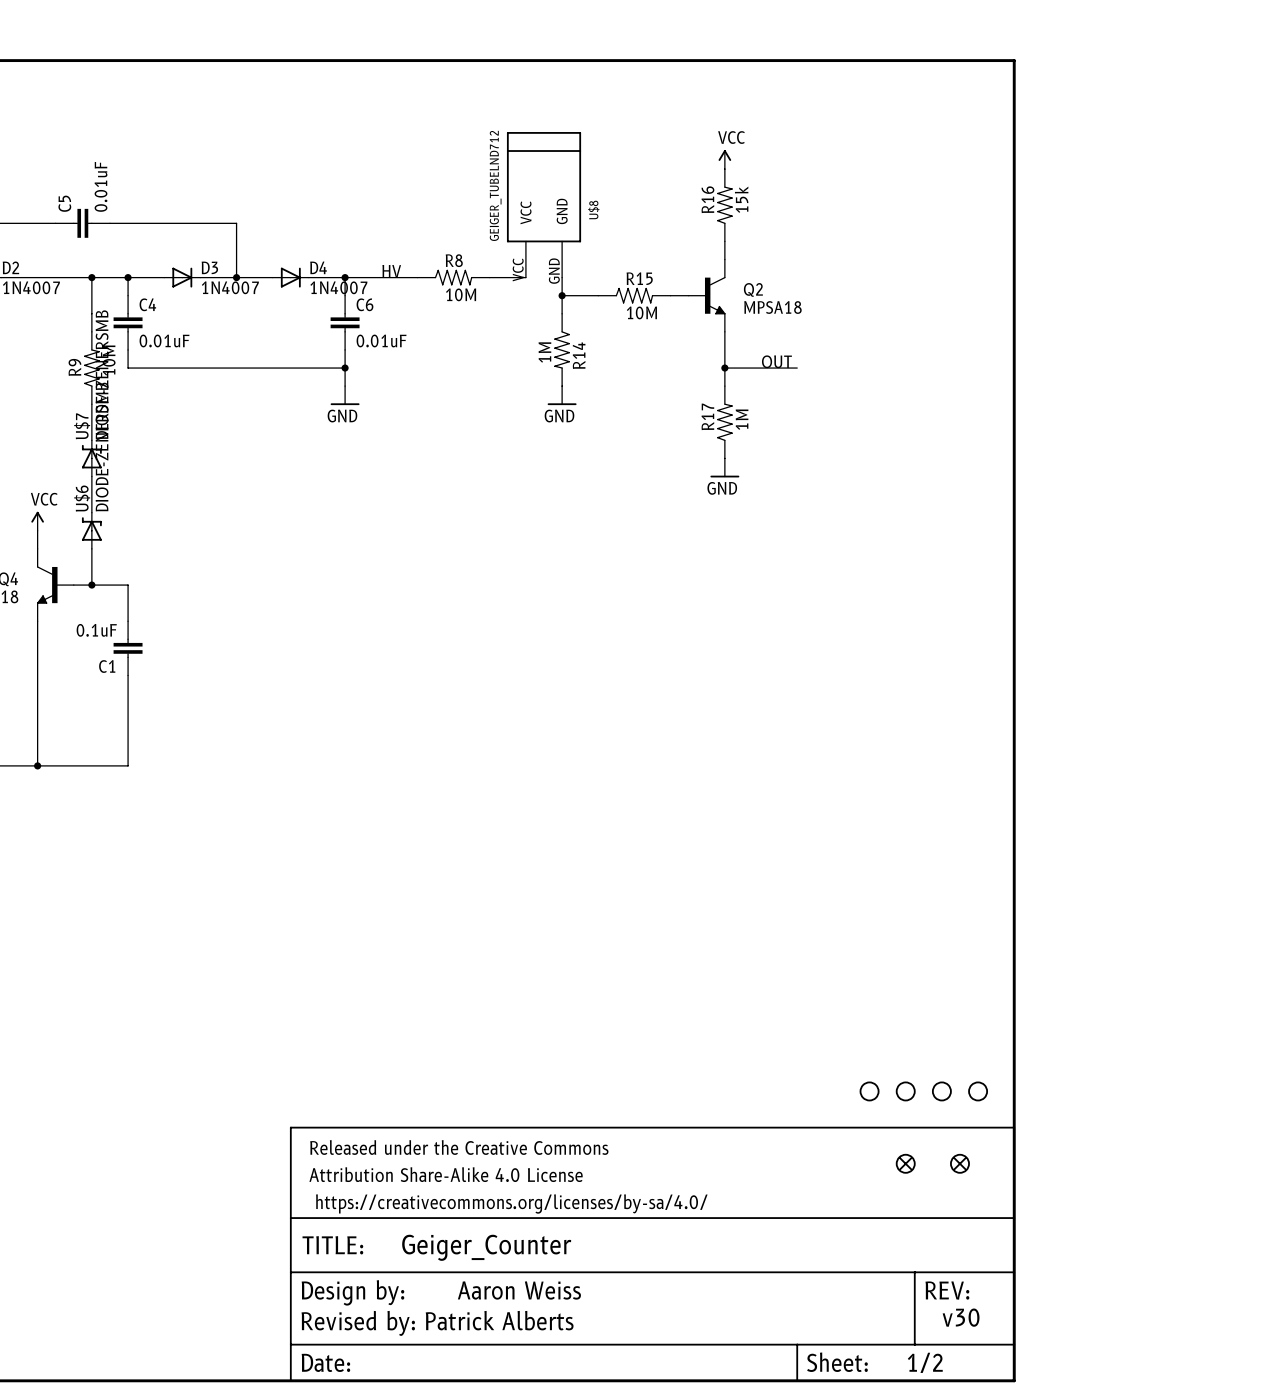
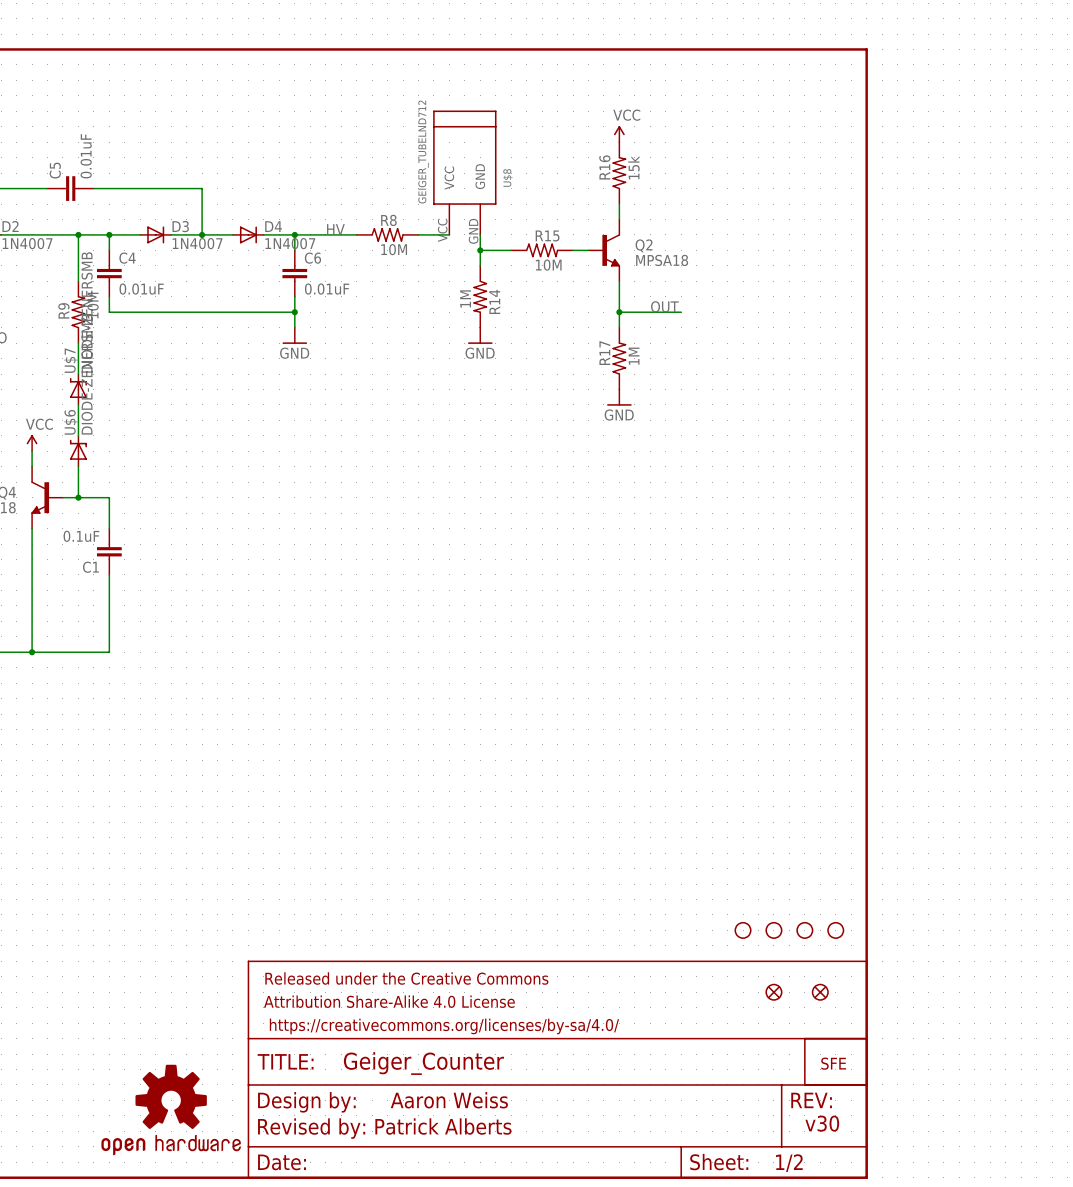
part: none -> (835, 1061)
part: none -> (171, 1110)

